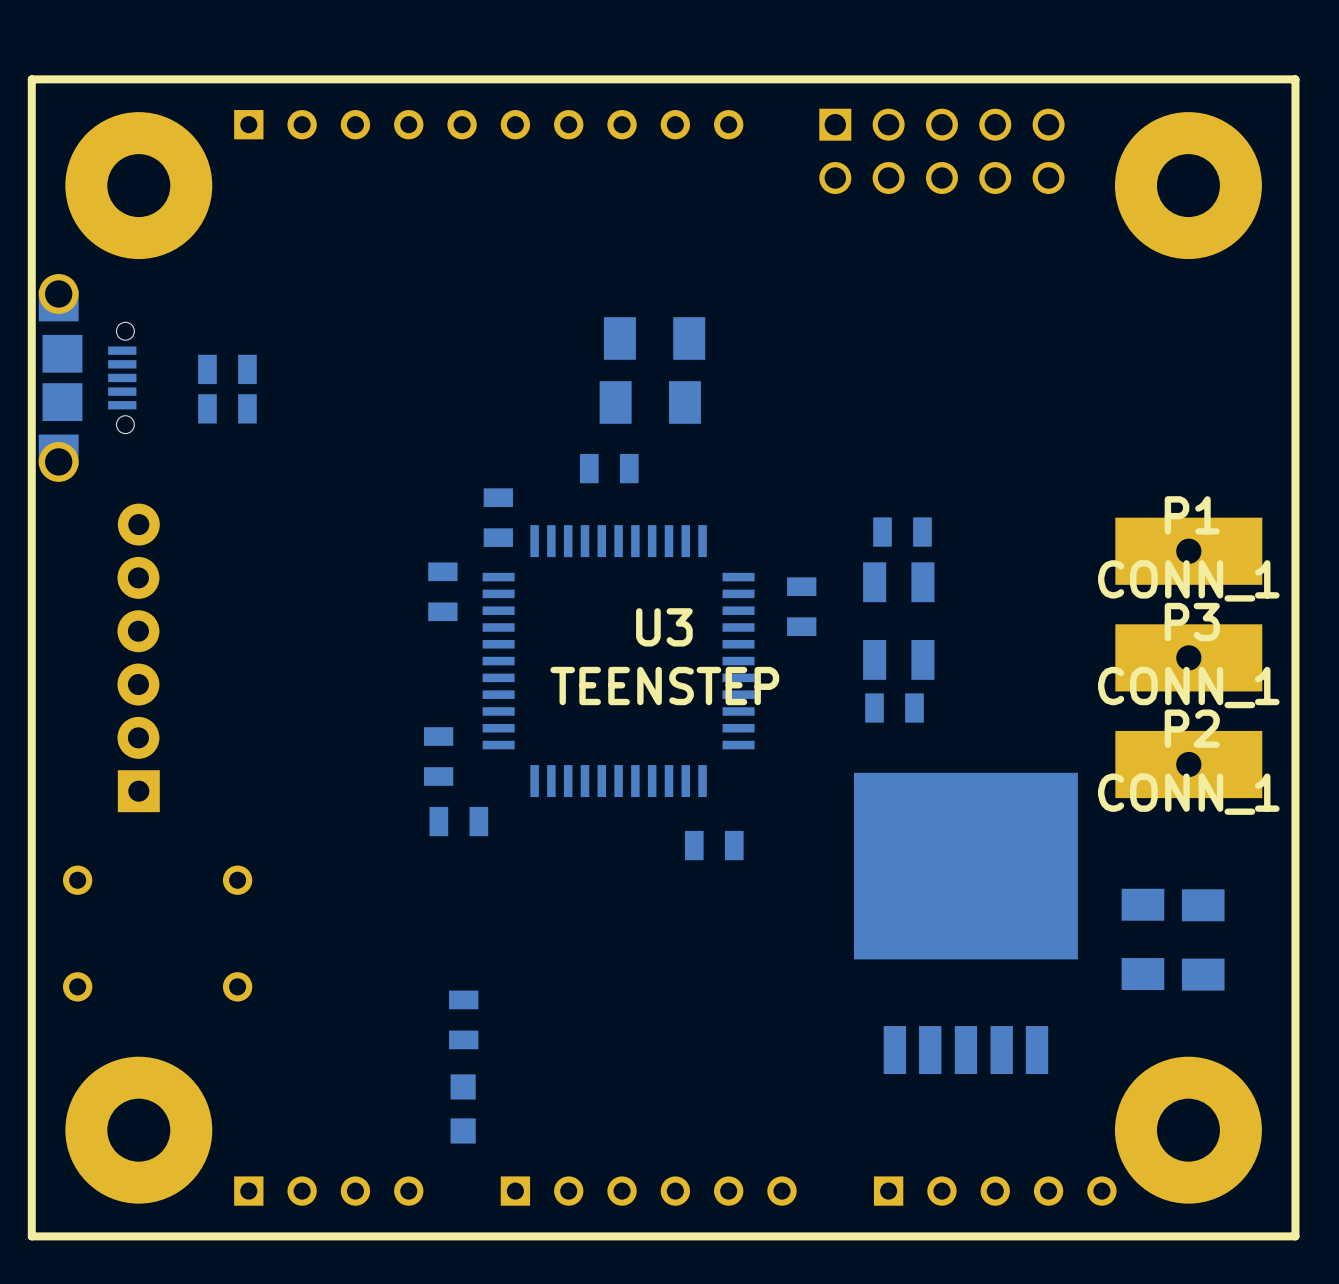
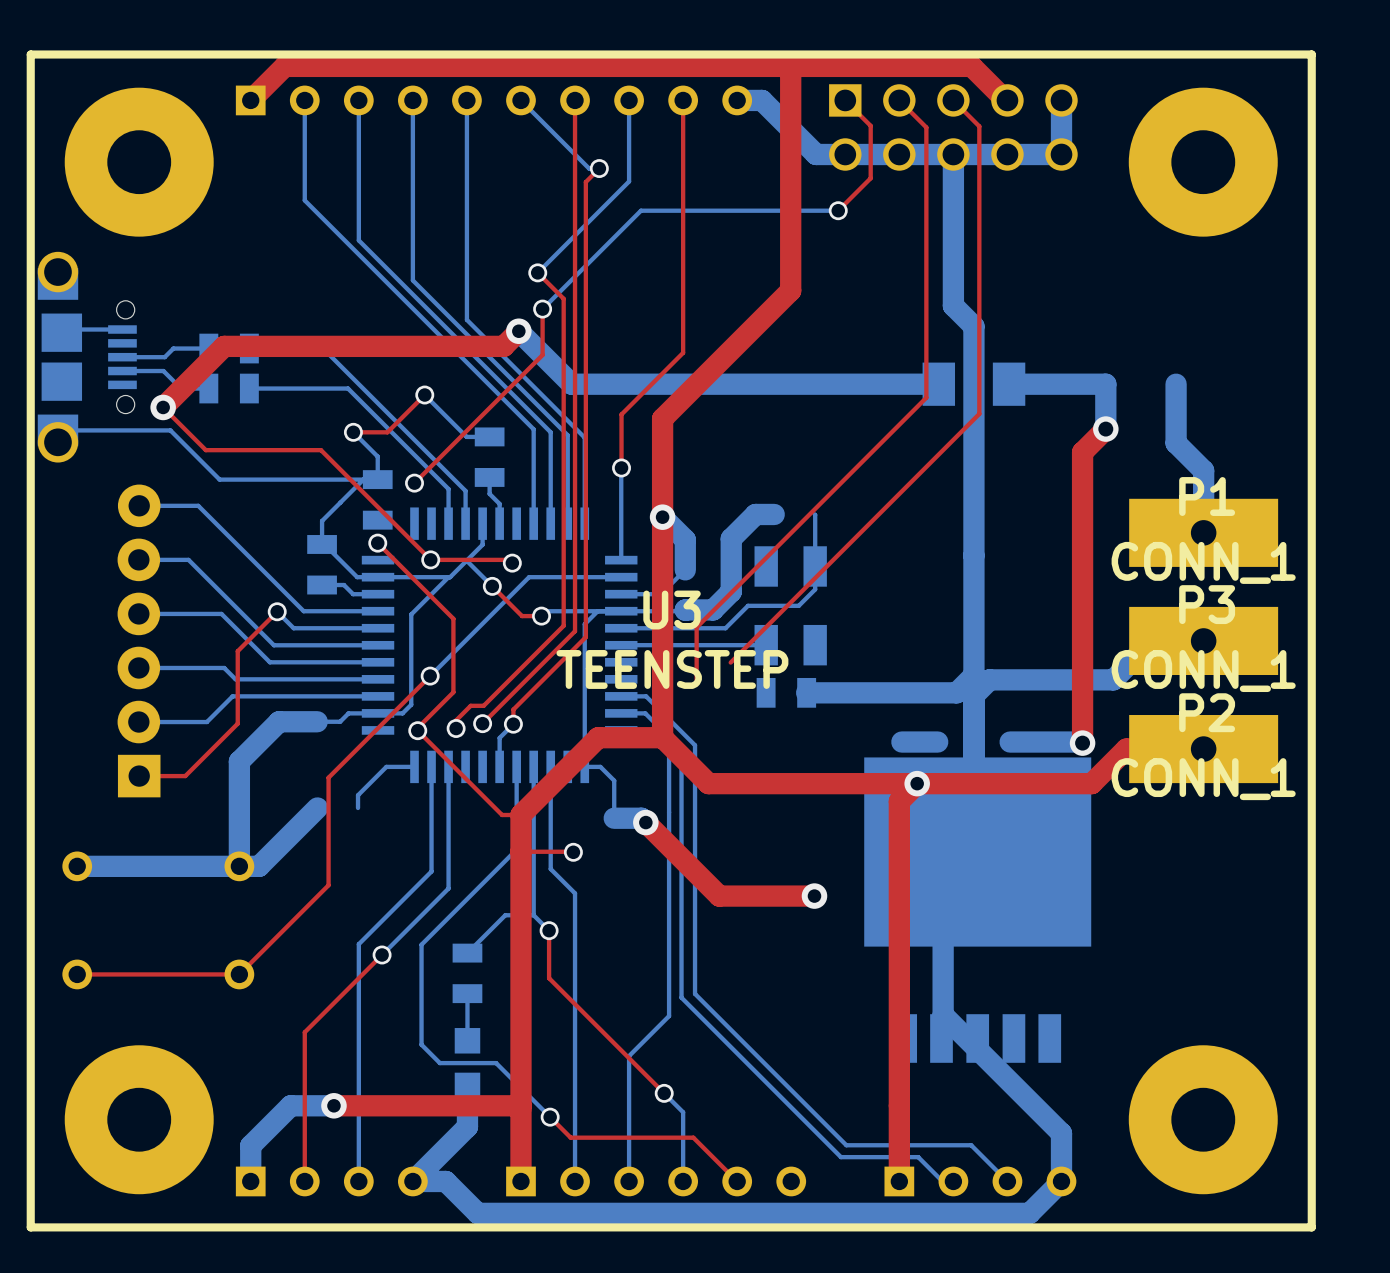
top track: none -> (790, 66) (790, 290) (662, 418) (662, 737)
top track: none -> (250, 100) (284, 66) (971, 66) (1007, 102) (1007, 100)
bottom track: none -> (304, 100) (304, 200) (533, 429) (533, 523)
bottom track: none -> (358, 100) (358, 240) (550, 432) (550, 523)
bottom track: none -> (412, 100) (412, 280) (567, 435) (567, 523)
bottom track: none -> (466, 100) (466, 319) (584, 437) (584, 523)
bottom track: none -> (520, 100) (589, 168) (599, 168)
top track: none -> (575, 100) (575, 631) (482, 723)
bottom track: none -> (629, 100) (629, 181) (537, 272)
top track: none -> (683, 100) (683, 352) (621, 414) (621, 467)
bottom track: none -> (737, 100) (762, 100) (816, 154) (1061, 154) (1061, 100)
top track: none -> (845, 100) (870, 125) (870, 178) (838, 210)
top track: none -> (899, 100) (926, 127) (926, 397) (696, 627) (696, 683)
top track: none -> (953, 100) (979, 126) (979, 413) (730, 662)
bottom track: none -> (953, 154) (953, 305) (973, 326) (973, 804) (997, 827)
top track: none -> (599, 168) (585, 182) (585, 637) (513, 709) (513, 724)
via: none -> (599, 168)
bottom track: none -> (838, 210) (640, 210) (542, 309)
via: none -> (838, 210)
top track: none -> (537, 272) (563, 298) (563, 625) (483, 705) (470, 705) (456, 720) (456, 728)
via: none -> (537, 272)
top track: none -> (542, 309) (542, 355) (414, 483)
via: none -> (542, 309)
part: (654, 338) -> none
bottom track: none -> (122, 329) (65, 329) (61, 332)
top track: none -> (518, 331) (503, 346) (224, 346) (163, 407) (205, 450) (320, 450) (430, 559) (509, 559) (512, 563)
bottom track: none -> (518, 331) (571, 384) (938, 384)
via: none -> (518, 331)
bottom track: none -> (208, 348) (173, 348) (164, 357) (122, 357)
bottom track: none -> (249, 348) (323, 348) (465, 490) (465, 523)
bottom track: none -> (122, 371) (163, 371) (181, 388) (208, 388)
part: (650, 402) -> none
part: none -> (973, 384)
bottom track: none -> (1009, 384) (1105, 384) (1105, 429)
bottom track: none -> (1176, 384) (1176, 443) (1203, 470) (1203, 532)
bottom track: none -> (249, 388) (348, 388) (448, 489) (448, 523)
top track: none -> (424, 395) (387, 432) (353, 432)
bottom track: none -> (424, 395) (466, 436) (489, 436)
via: none -> (424, 395)
via: none -> (163, 407)
top track: none -> (1105, 429) (1082, 452) (1082, 743)
via: none -> (1105, 429)
bottom track: none -> (353, 432) (377, 456) (377, 479) (219, 479) (170, 430) (57, 430) (57, 442)
via: none -> (353, 432)
part: (609, 468) -> none
bottom track: none -> (621, 468) (621, 560)
via: none -> (621, 467)
bottom track: none -> (489, 477) (489, 493) (499, 503) (499, 523)
bottom track: none -> (363, 479) (322, 520) (322, 544) (324, 544) (357, 577) (450, 577) (482, 544) (482, 523)
via: none -> (414, 483)
part position: (498, 517) -> (489, 457)
part: none -> (377, 499)
bottom track: none -> (139, 505) (198, 505) (303, 611) (378, 611)
part: (902, 532) -> none
bottom track: none -> (774, 514) (755, 514) (731, 538) (731, 591) (713, 609) (546, 611) (541, 616)
bottom track: none -> (814, 514) (815, 589) (798, 605) (748, 605) (725, 628) (621, 628)
bottom track: none -> (662, 517) (685, 539) (685, 569) (660, 594) (621, 594)
via: none -> (662, 517)
top track: none -> (377, 543) (453, 618) (453, 692) (417, 727) (417, 730) (502, 815) (520, 815)
via: none -> (377, 543)
bottom track: none -> (138, 559) (188, 559) (273, 645) (378, 645)
via: none -> (430, 559)
bottom track: none -> (466, 560) (492, 586)
via: none -> (512, 563)
part: none -> (322, 564)
part: (442, 591) -> none
bottom track: none -> (448, 577) (411, 614) (411, 704) (402, 713) (348, 713) (340, 721) (279, 721) (239, 761) (239, 866)
bottom track: none -> (621, 577) (529, 577) (430, 676)
bottom track: none -> (322, 585) (343, 585) (353, 594) (378, 594)
top track: none -> (492, 586) (522, 616) (541, 616)
via: none -> (492, 586)
part: (801, 606) -> none
part position: (898, 621) -> (790, 605)
bottom track: none -> (597, 611) (584, 624) (584, 766) (600, 766) (614, 780) (614, 818) (641, 818) (645, 822)
top track: none -> (277, 611) (237, 651) (237, 723) (185, 776) (139, 776)
bottom track: none -> (277, 611) (293, 628) (378, 628)
via: none -> (277, 611)
bottom track: none -> (138, 613) (221, 613) (269, 662) (378, 662)
via: none -> (541, 616)
bottom track: none -> (1203, 640) (1152, 640) (1113, 679) (989, 679) (973, 695)
part position: (618, 661) -> (499, 645)
bottom track: none -> (621, 645) (766, 645)
bottom track: none -> (138, 667) (224, 667) (235, 679) (378, 679)
top track: none -> (430, 676) (328, 777) (328, 885) (239, 974) (77, 974)
via: none -> (430, 676)
bottom track: none -> (973, 675) (956, 692) (806, 692)
part: (894, 708) -> none
part: none -> (786, 692)
bottom track: none -> (378, 696) (232, 696) (206, 722) (138, 722)
bottom track: none -> (621, 696) (646, 696) (695, 745) (695, 993) (846, 1145) (971, 1145) (1007, 1181)
bottom track: none -> (621, 713) (645, 713) (681, 749) (681, 997) (840, 1157) (918, 1157) (942, 1181) (953, 1181)
via: none -> (482, 723)
bottom track: none -> (513, 724) (499, 737) (499, 766)
via: none -> (513, 724)
via: none -> (456, 728)
via: none -> (417, 730)
bottom track: none -> (621, 730) (646, 730) (669, 753) (669, 1016) (629, 1056) (629, 1181)
top track: none -> (662, 737) (708, 783) (1091, 783) (1126, 749) (1203, 749)
top track: none -> (662, 737) (598, 737) (520, 815)
part: (438, 756) -> none
bottom track: none -> (901, 742) (937, 742)
bottom track: none -> (1010, 742) (1082, 743)
via: none -> (1082, 743)
bottom track: none -> (414, 766) (386, 766) (358, 795) (358, 807)
bottom track: none -> (431, 766) (431, 871) (358, 944) (358, 1181)
bottom track: none -> (448, 766) (448, 888) (382, 954)
bottom track: none -> (516, 766) (516, 849) (421, 944) (421, 1044) (439, 1063) (496, 1063) (550, 1117)
bottom track: none -> (533, 766) (533, 915)
bottom track: none -> (550, 766) (550, 869) (575, 893) (575, 1181)
top track: none -> (917, 783) (899, 801) (899, 1181)
via: none -> (917, 783)
bottom track: none -> (973, 797) (943, 827) (943, 1014) (1061, 1133) (1061, 1181) (1029, 1213) (477, 1213) (445, 1181) (412, 1181) (467, 1126) (467, 1085)
part: (458, 821) -> none
bottom track: none -> (317, 807) (259, 866) (77, 866)
top track: none -> (520, 815) (520, 1181)
top track: none -> (645, 822) (719, 896) (814, 896)
via: none -> (645, 822)
part: (714, 845) -> none
top track: none -> (520, 851) (573, 852)
via: none -> (573, 852)
via: none -> (814, 896)
bottom track: none -> (533, 915) (505, 915) (467, 953)
bottom track: none -> (533, 915) (549, 930)
part: (1142, 939) -> none
part: (1203, 939) -> none
top track: none -> (549, 930) (549, 978) (664, 1093)
via: none -> (549, 930)
top track: none -> (382, 954) (304, 1032) (304, 1181)
via: none -> (382, 954)
bottom track: none -> (467, 993) (467, 1040)
part position: (463, 1019) -> (467, 973)
bottom track: none -> (664, 1093) (683, 1112) (683, 1181)
via: none -> (664, 1093)
part position: (463, 1108) -> (467, 1063)
top track: none -> (333, 1105) (520, 1105) (520, 1111)
bottom track: none -> (333, 1105) (290, 1105) (250, 1145) (250, 1181)
via: none -> (333, 1105)
top track: none -> (550, 1117) (570, 1137) (693, 1137) (737, 1181)
via: none -> (550, 1117)
part: none -> (980, 1181)
part: (995, 1191) -> none

